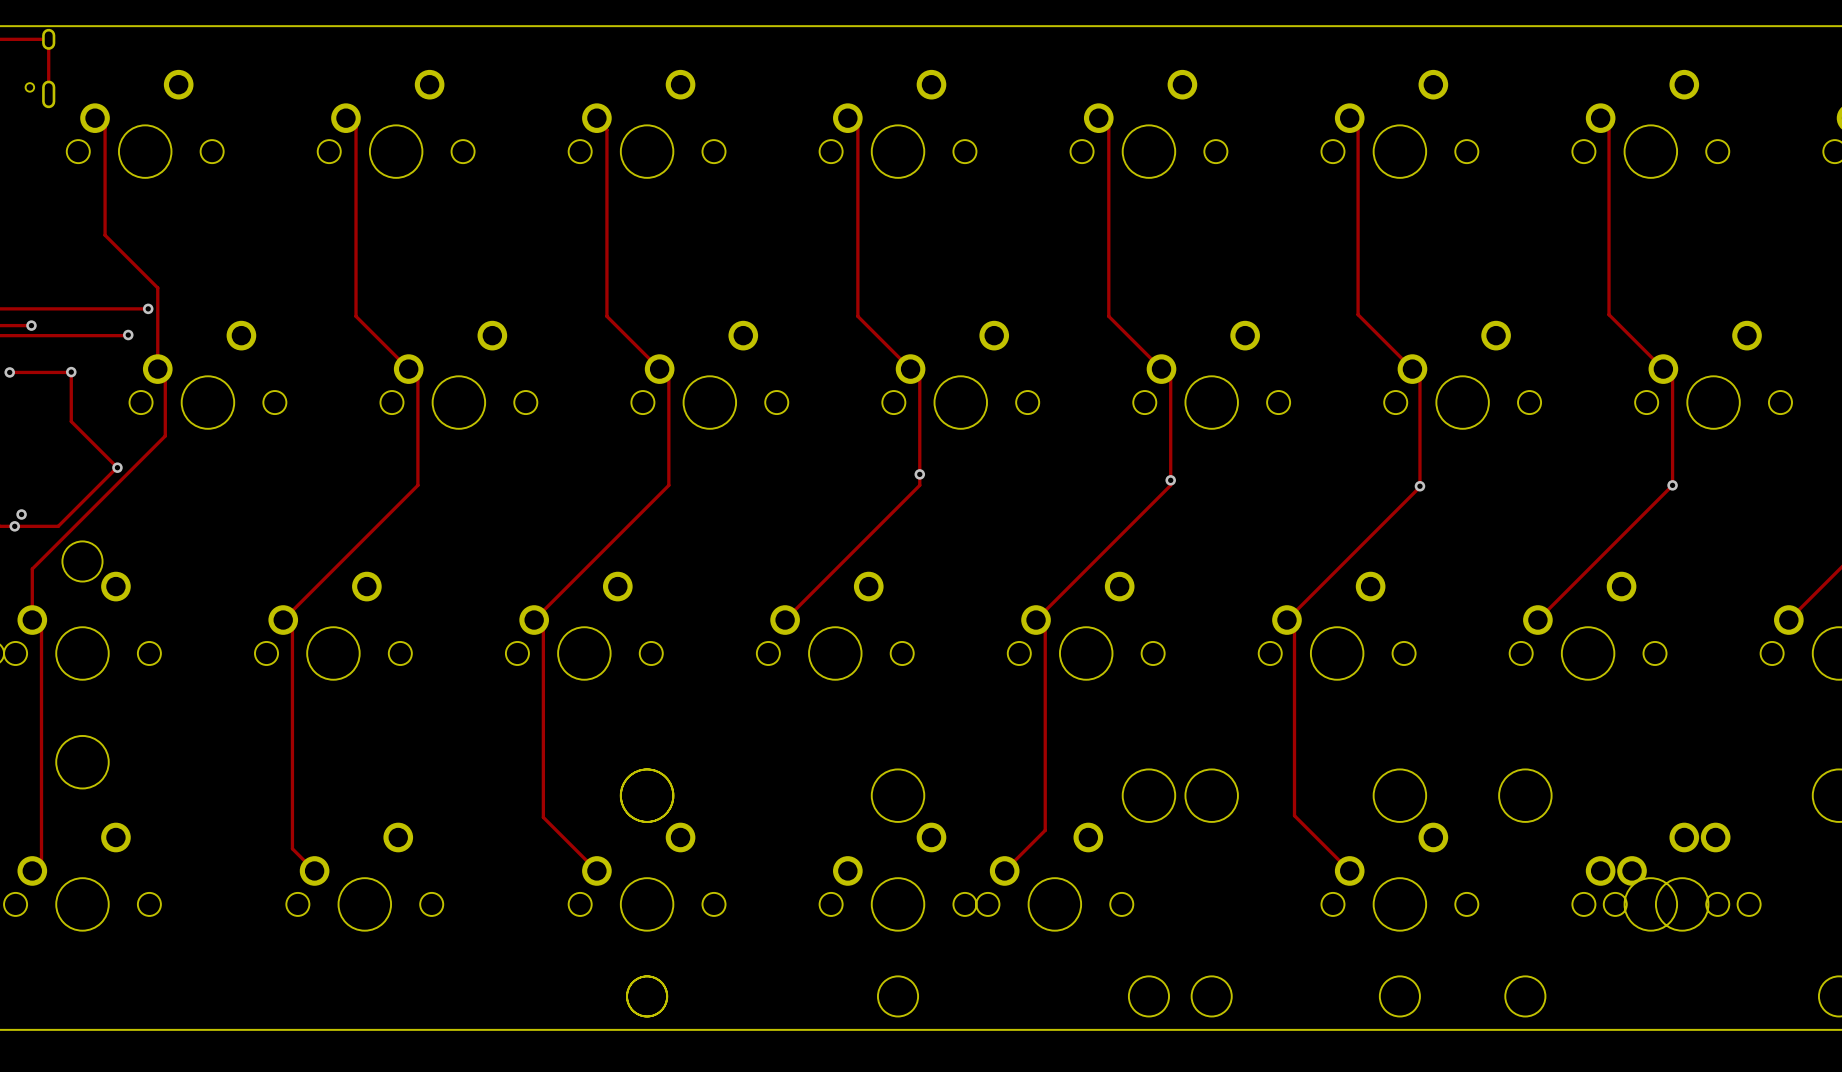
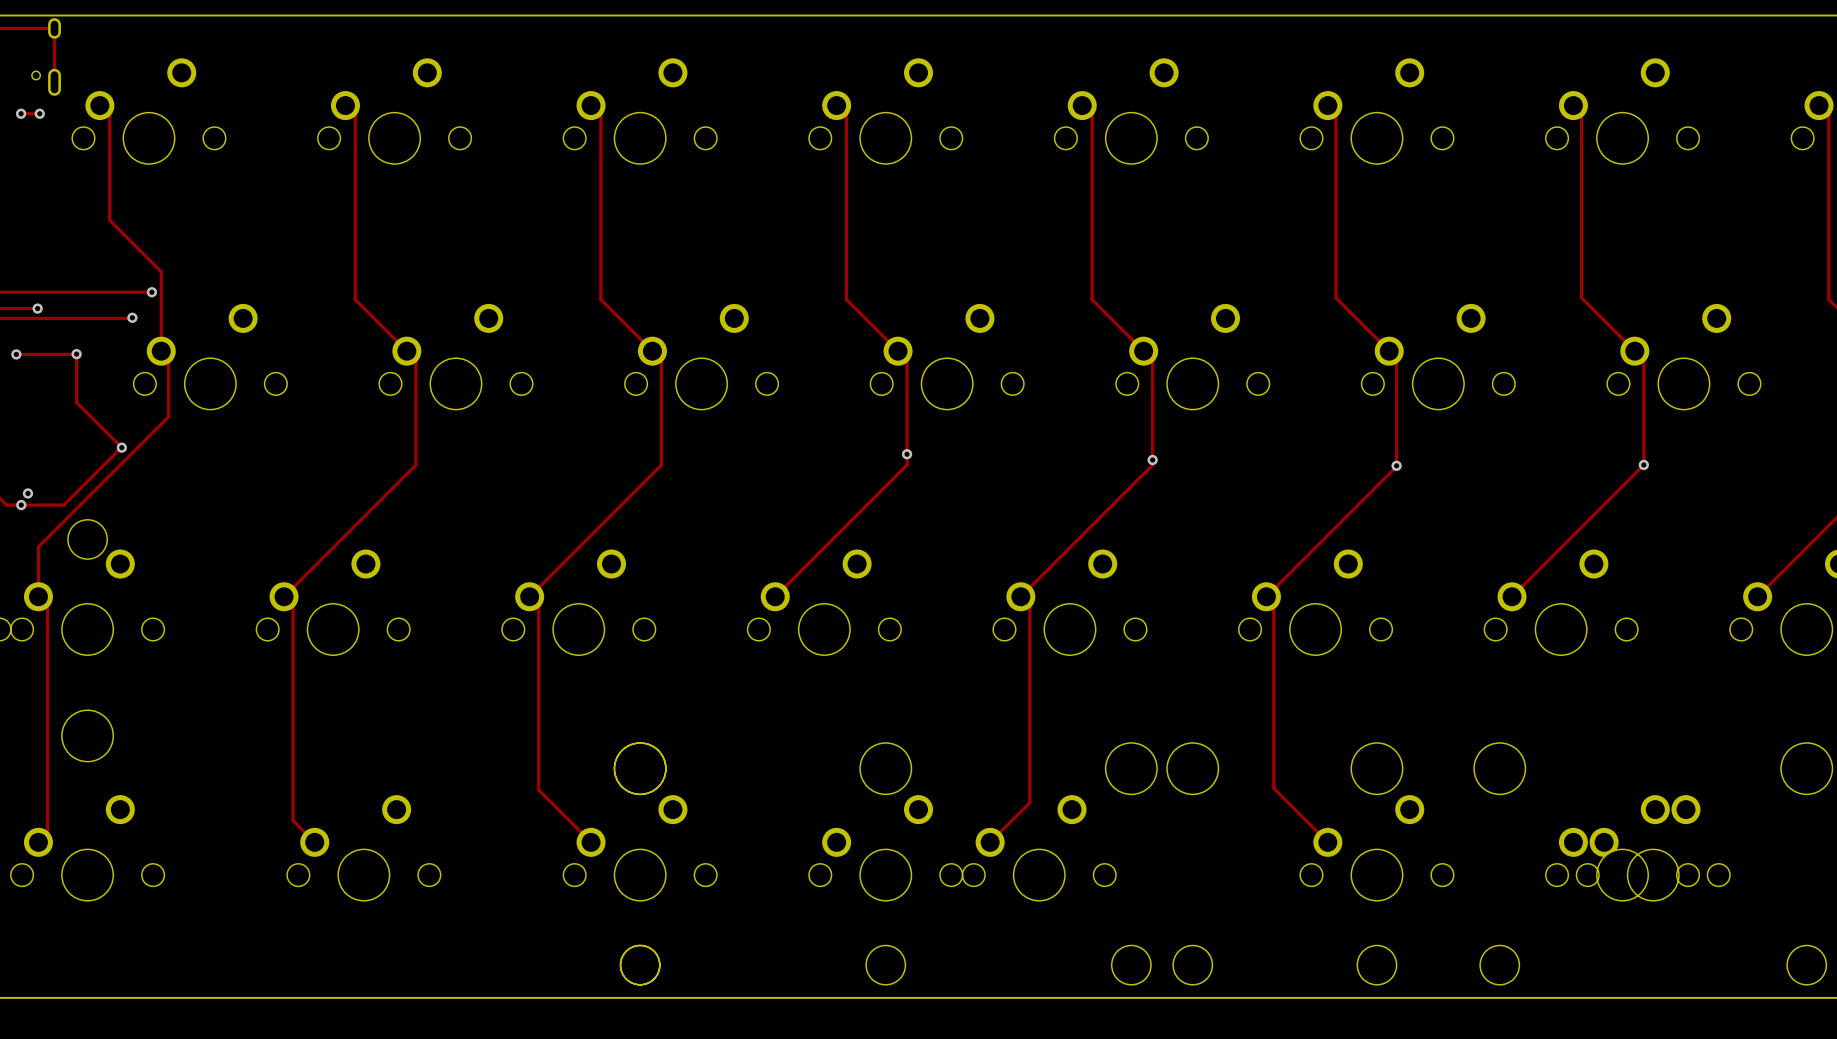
track: none -> (21, 113) (39, 113)
via: none -> (21, 113)
via: none -> (39, 113)

